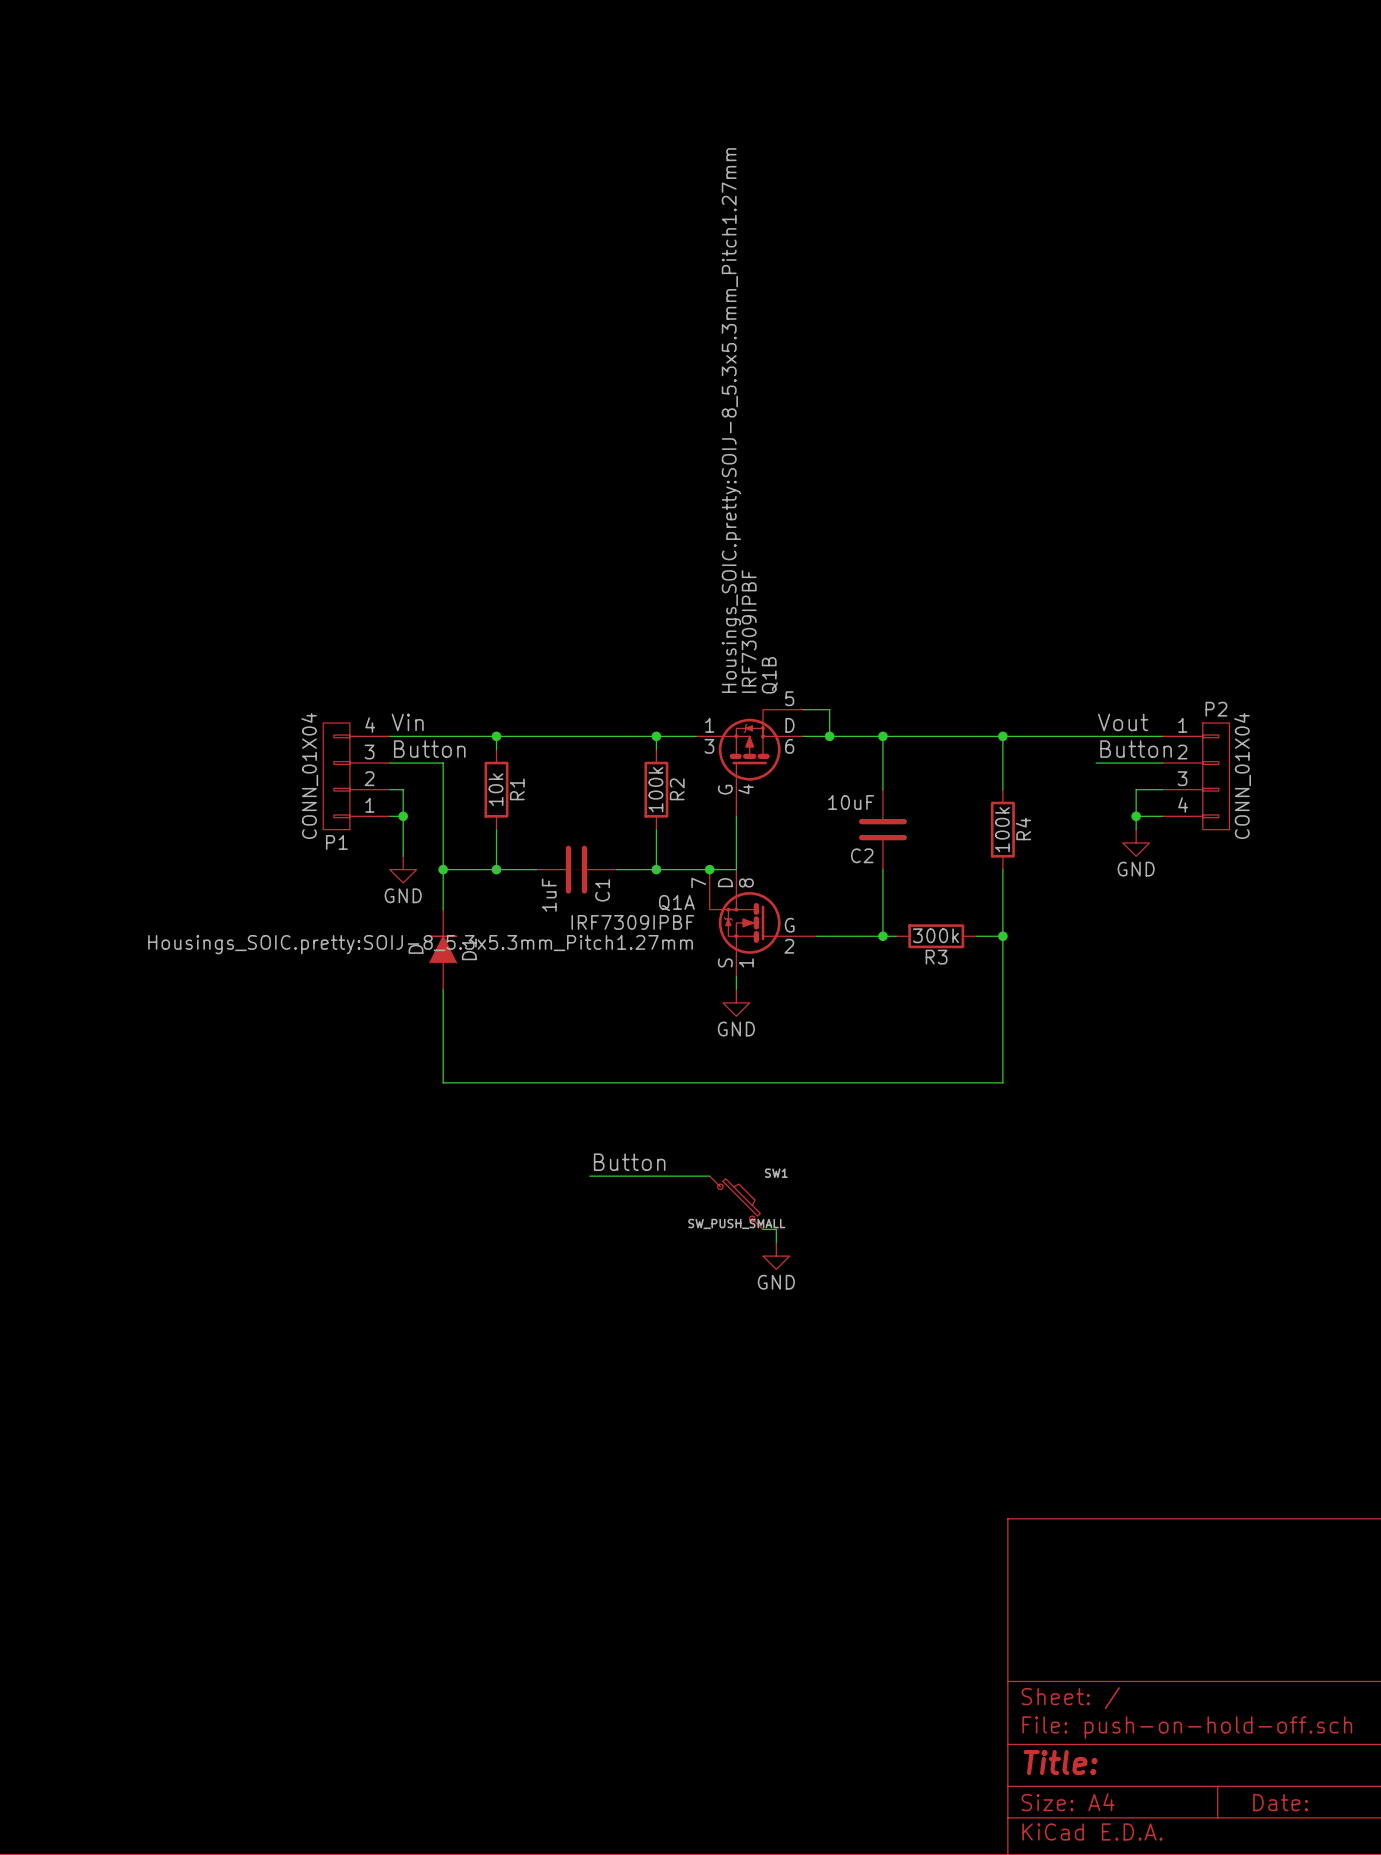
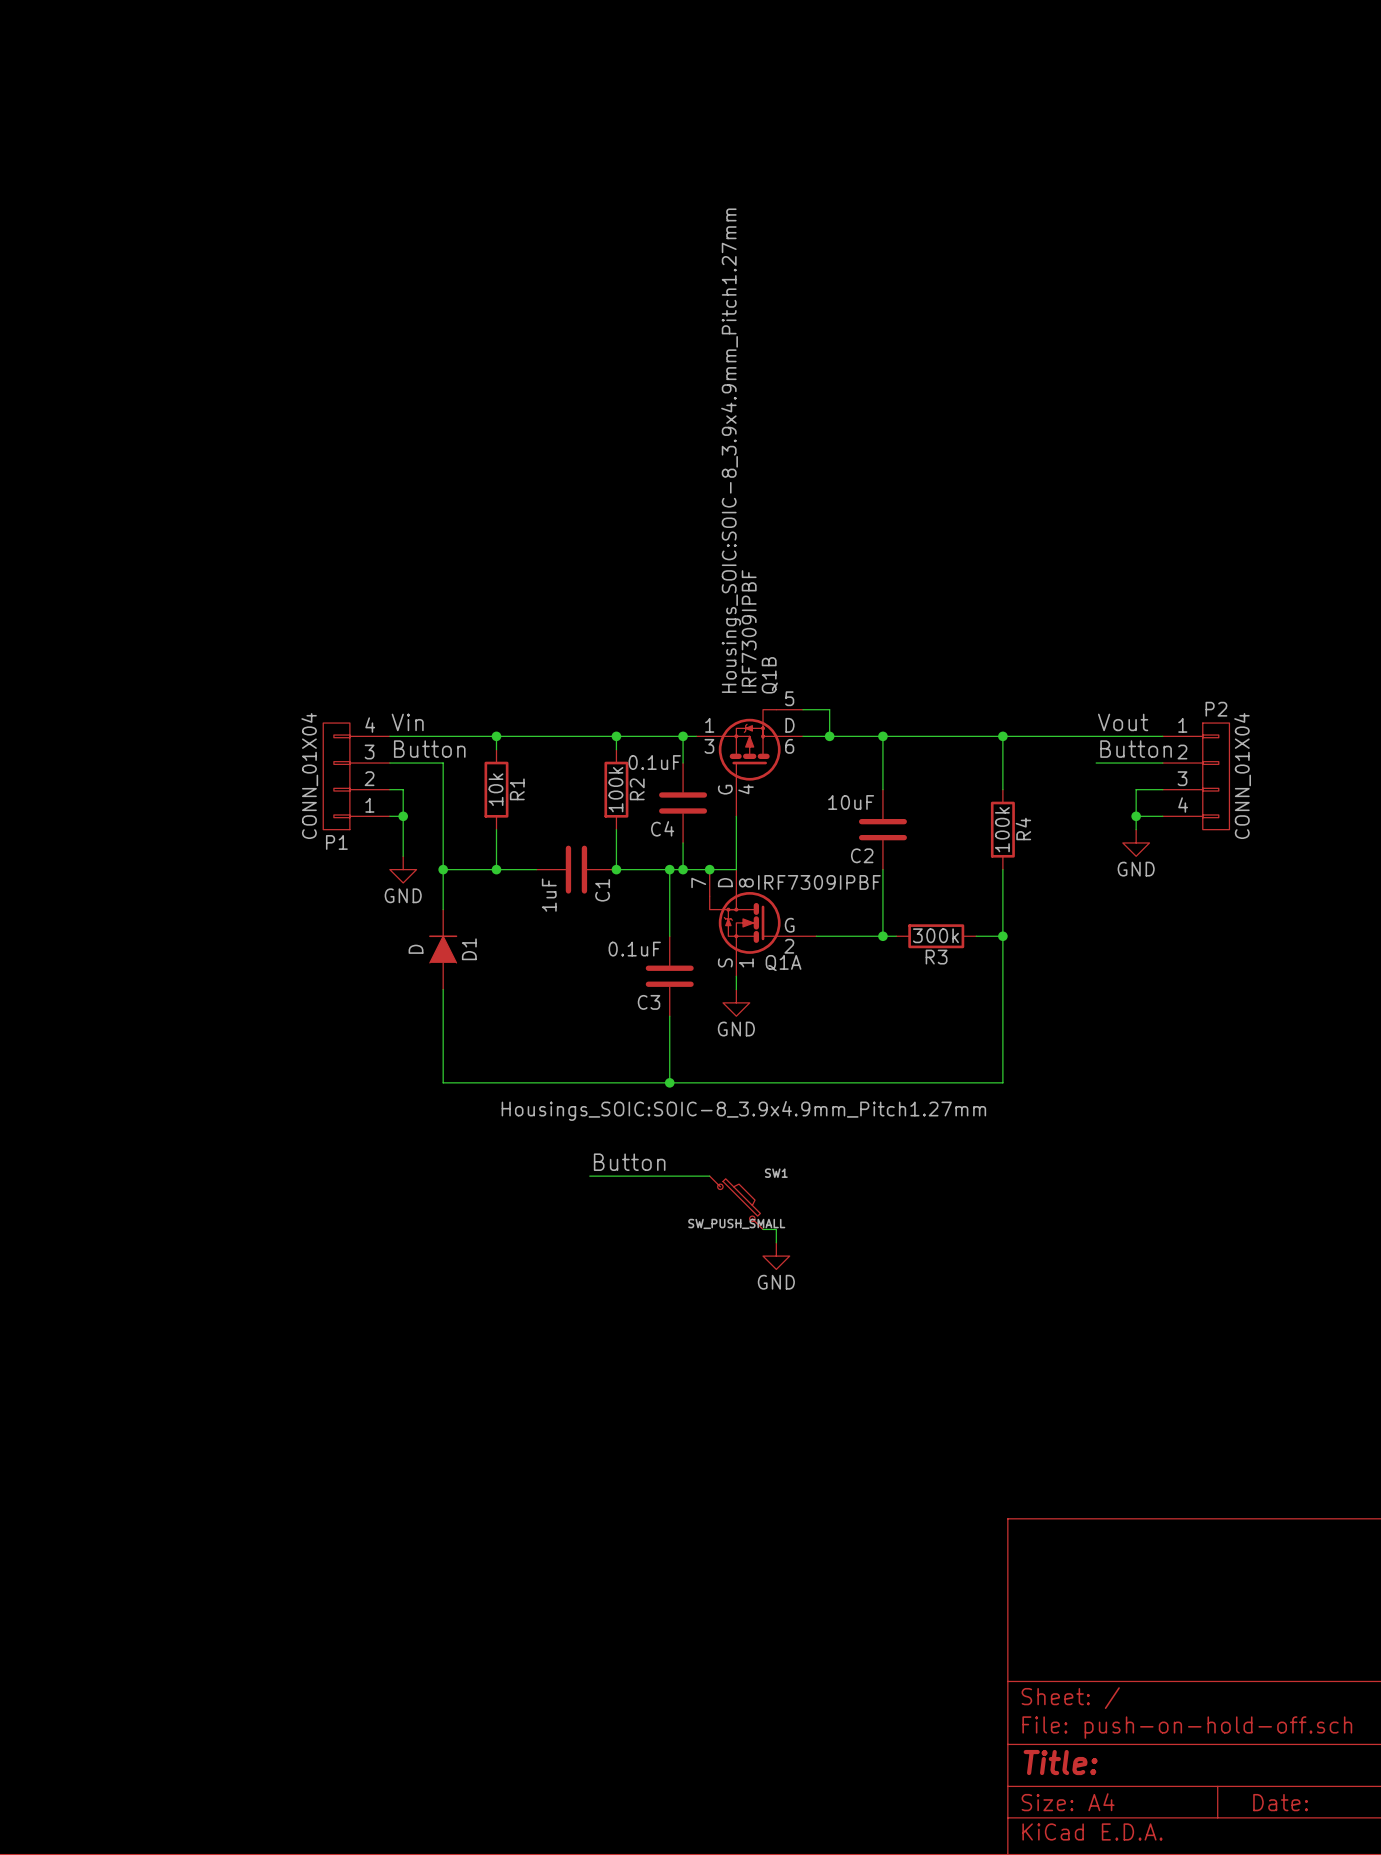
Q1B text: Housings_SOIC.pretty:SOIJ-8_5.3x5.3mm_Pitch1.27mm (731, 420) -> Housings_SOIC:SOIC-8_3.9x4.9mm_Pitch1.27mm (731, 450)
junction: none -> (616, 736)
wire: (656, 736) (656, 749) -> (616, 736) (616, 749)
junction: (656, 736) -> none
wire: none -> (683, 736) (683, 763)
junction: none -> (683, 736)
R2 position: (656, 789) -> (616, 789)
C4: none -> 0.1uF (683, 802)
wire: (656, 829) (656, 869) -> (616, 829) (616, 869)
wire: none -> (683, 842) (683, 869)
junction: none -> (616, 869)
junction: (656, 869) -> none
wire: none -> (669, 869) (669, 936)
junction: none -> (669, 869)
junction: none -> (683, 869)
Q1A name position: Q1A (676, 903) -> Q1A (783, 963)
Q1A value position: IRF7309IPBF (632, 922) -> IRF7309IPBF (819, 882)
Q1A text: Housings_SOIC.pretty:SOIJ-8_5.3x5.3mm_Pitch1.27mm (420, 944) -> Housings_SOIC:SOIC-8_3.9x4.9mm_Pitch1.27mm (743, 1110)
C3: none -> 0.1uF (669, 976)
wire: none -> (669, 1016) (669, 1082)
junction: none -> (669, 1082)

